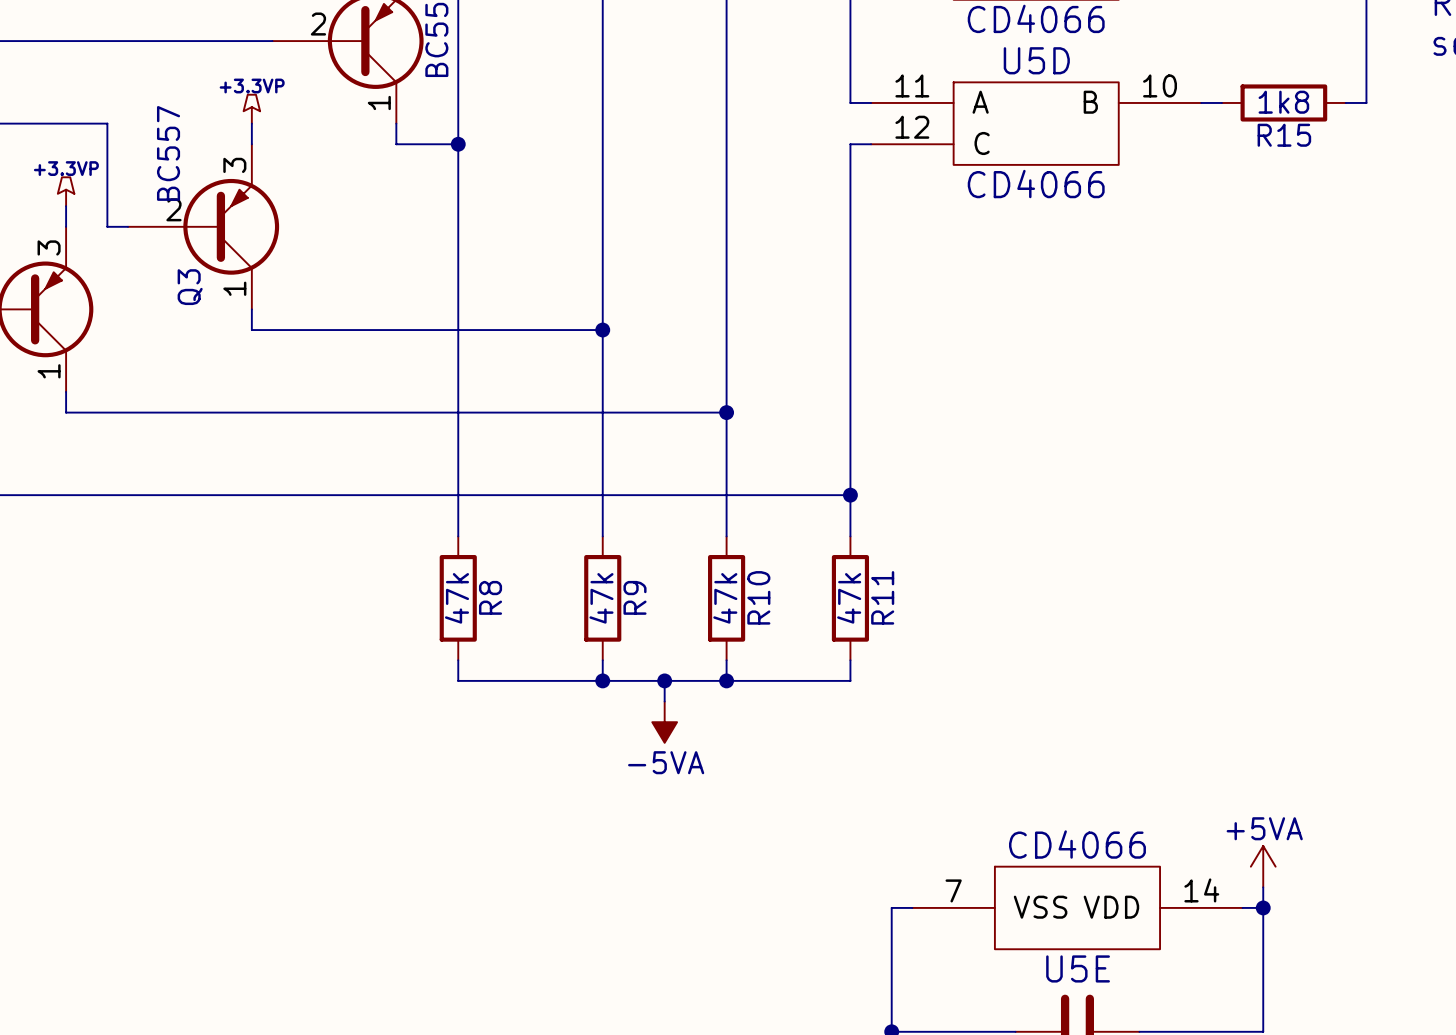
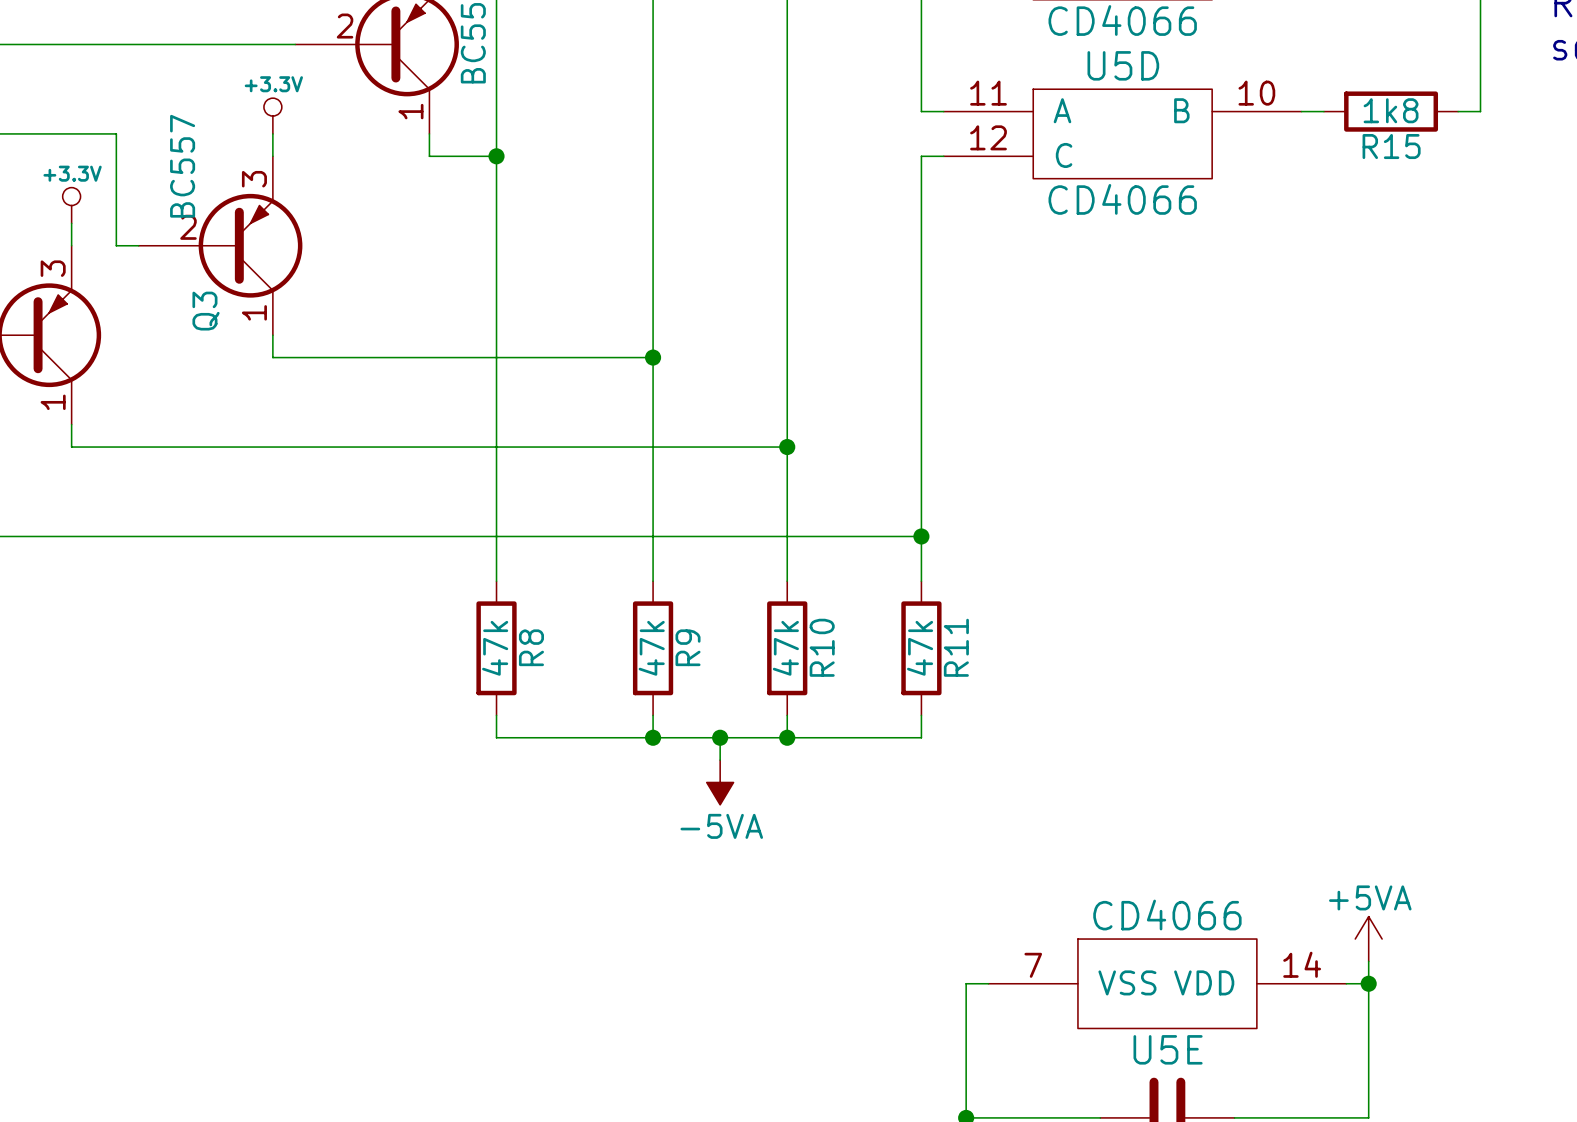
power symbol: +3.3VP (251, 109) -> +3.3V (272, 116)
power symbol: +3.3VP (66, 191) -> +3.3V (71, 205)

